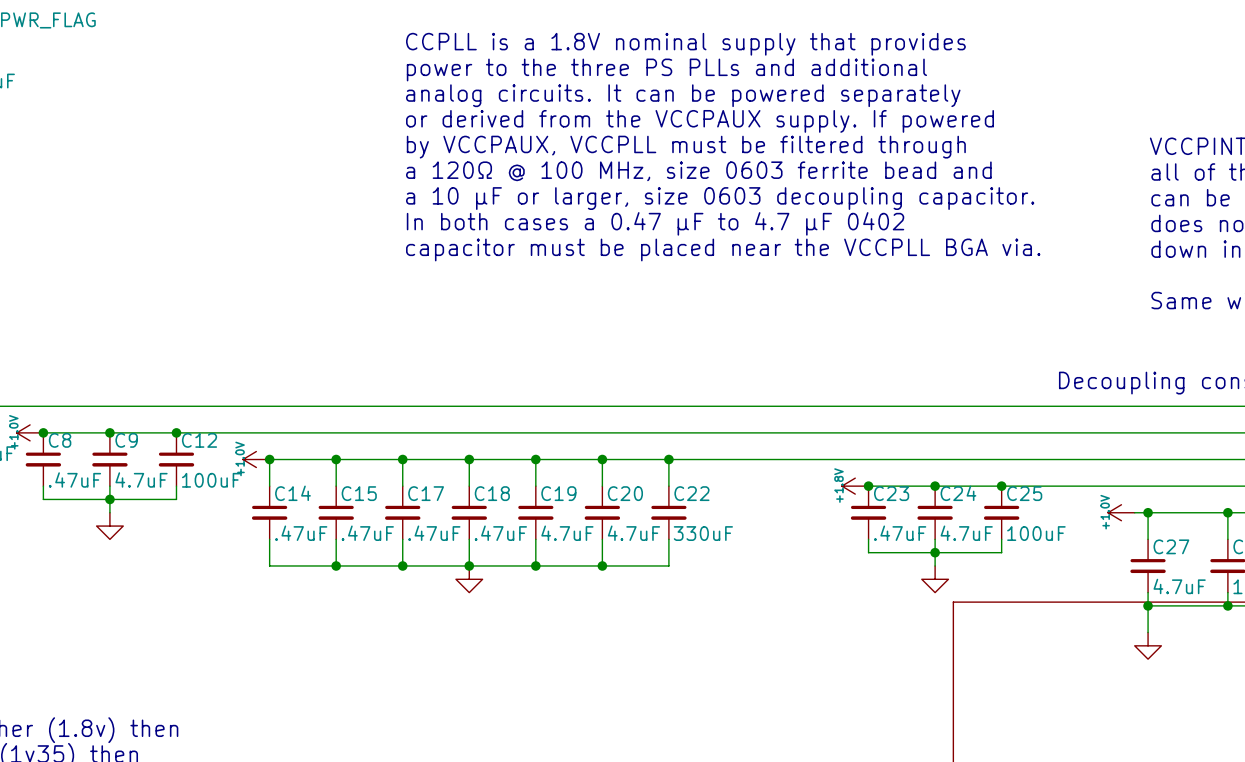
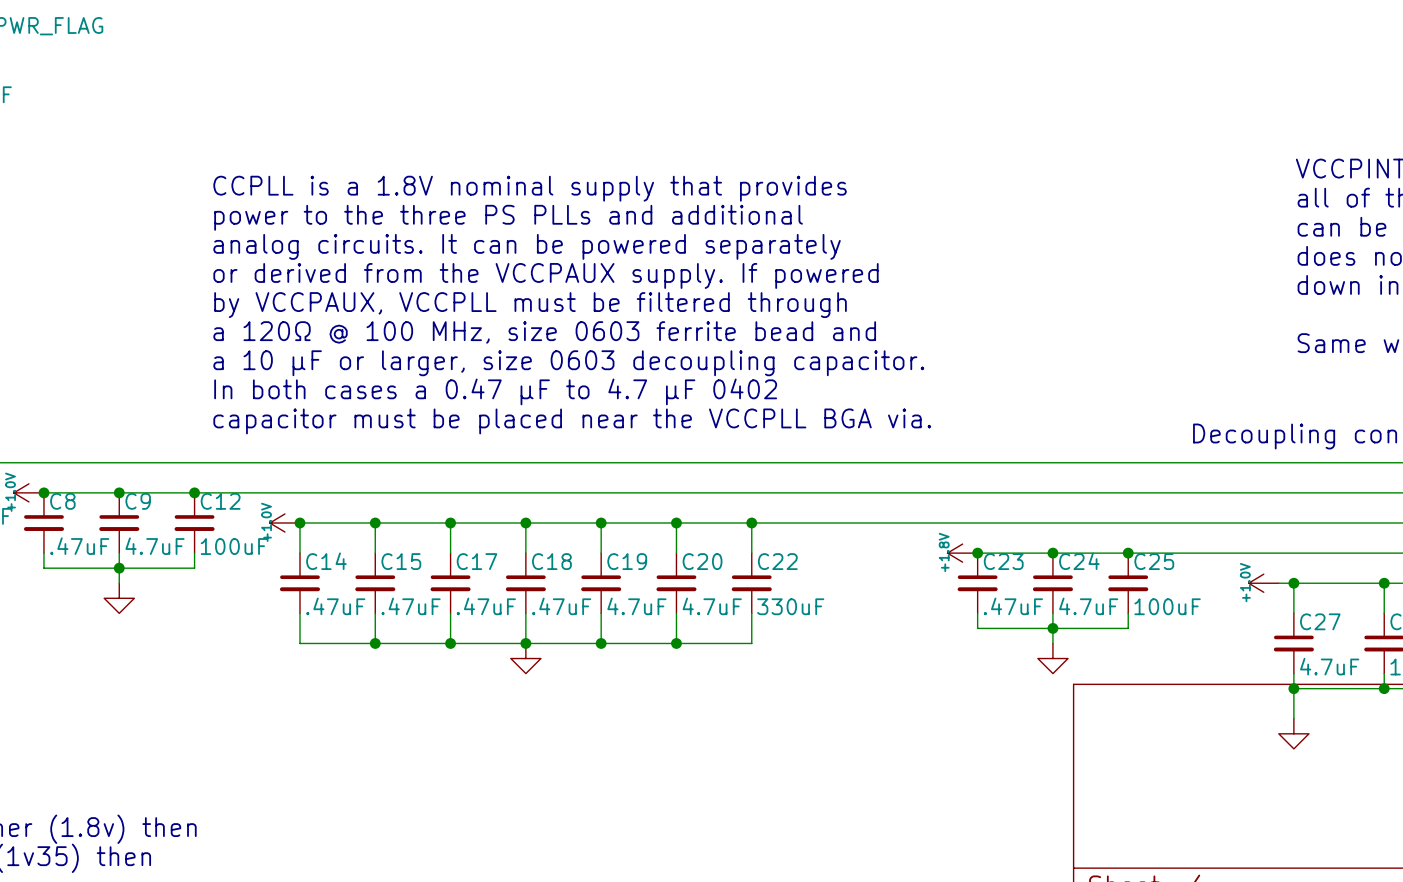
text position: CCPLL is a 1.8V nominal supply that provides (685, 44) -> CCPLL is a 1.8V nominal supply that provides (530, 188)
text position: power to the three PS PLLs and additional (666, 69) -> power to the three PS PLLs and additional (508, 217)
text position: analog circuits. It can be powered separately (683, 95) -> analog circuits. It can be powered separately (527, 246)
text position: or derived from the VCCPAUX supply. If powered (700, 121) -> or derived from the VCCPAUX supply. If powered (545, 275)
text position: by VCCPAUX, VCCPLL must be filtered through (686, 147) -> by VCCPAUX, VCCPLL must be filtered through (530, 305)
text position: a 120Ω @ 100 MHz, size 0603 ferrite bead and (698, 171) -> a 120Ω @ 100 MHz, size 0603 ferrite bead and (544, 332)
text position: a 10 µF or larger, size 0603 decoupling capacitor. (720, 198) -> a 10 µF or larger, size 0603 decoupling capacitor. (568, 363)
text position: In both cases a 0.47 µF to 4.7 µF 0402 (655, 223) -> In both cases a 0.47 µF to 4.7 µF 0402 (495, 391)
text position: capacitor must be placed near the VCCPLL BGA via. (723, 249) -> capacitor must be placed near the VCCPLL BGA via. (572, 421)

